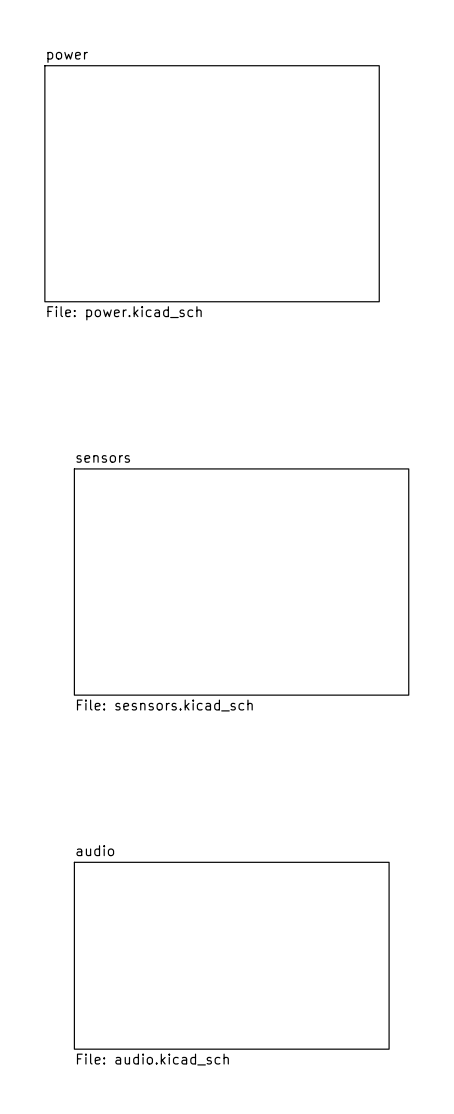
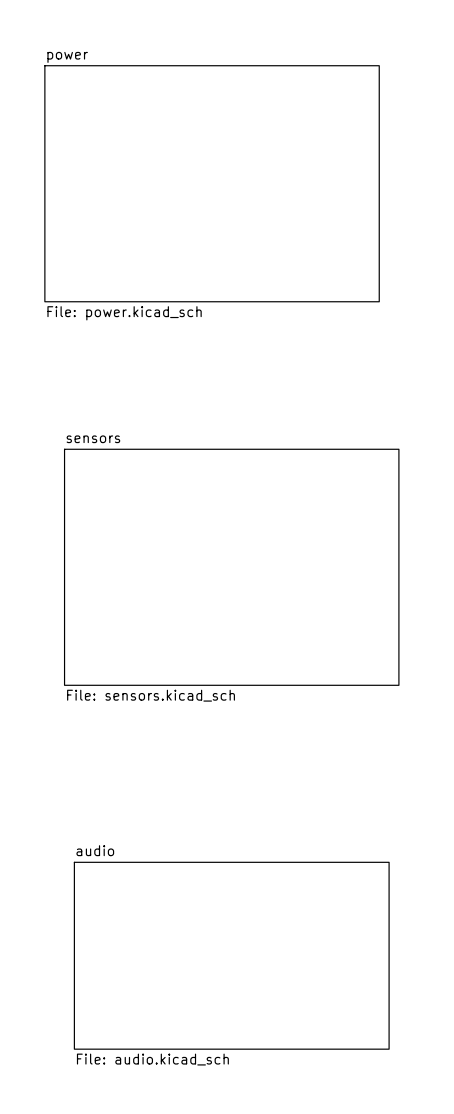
sheet sensors: none -> File: sensors.kicad_sch (231, 567)
sheet sensors: File: sesnsors.kicad_sch (241, 582) -> none

